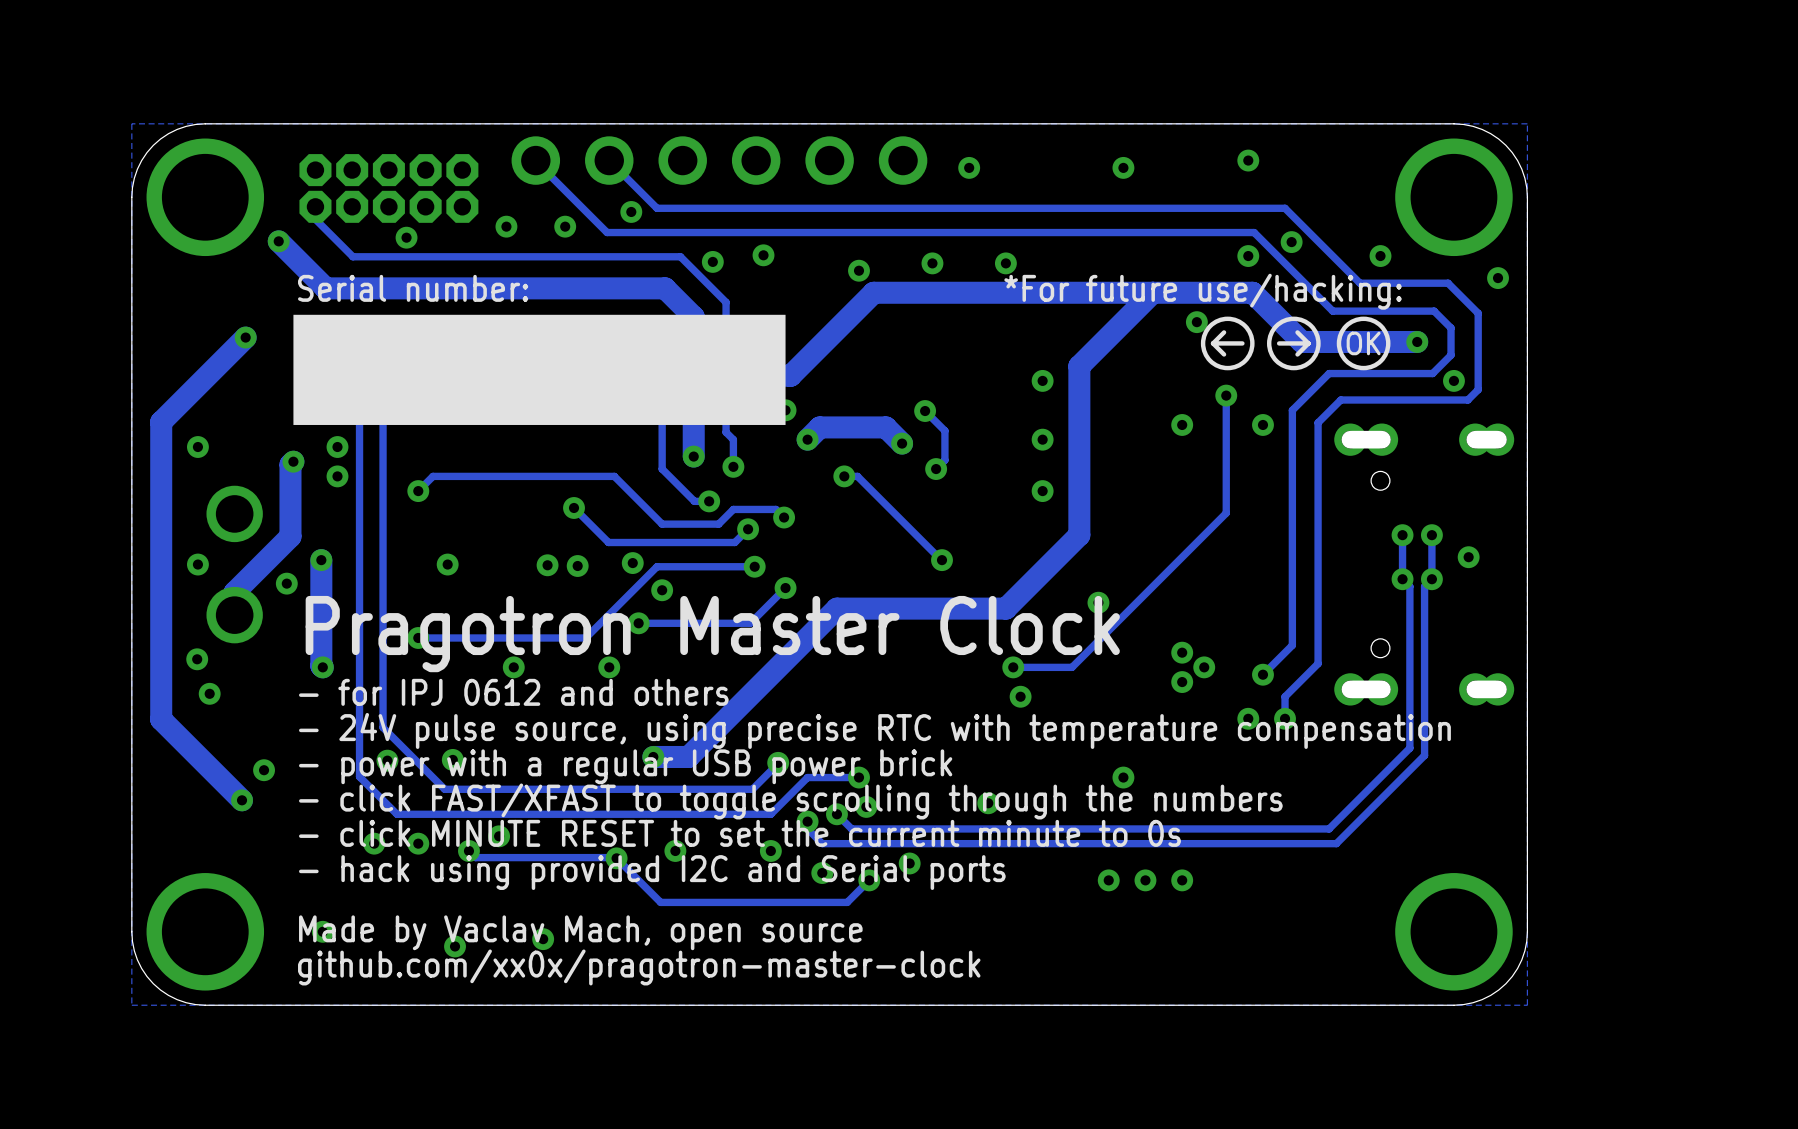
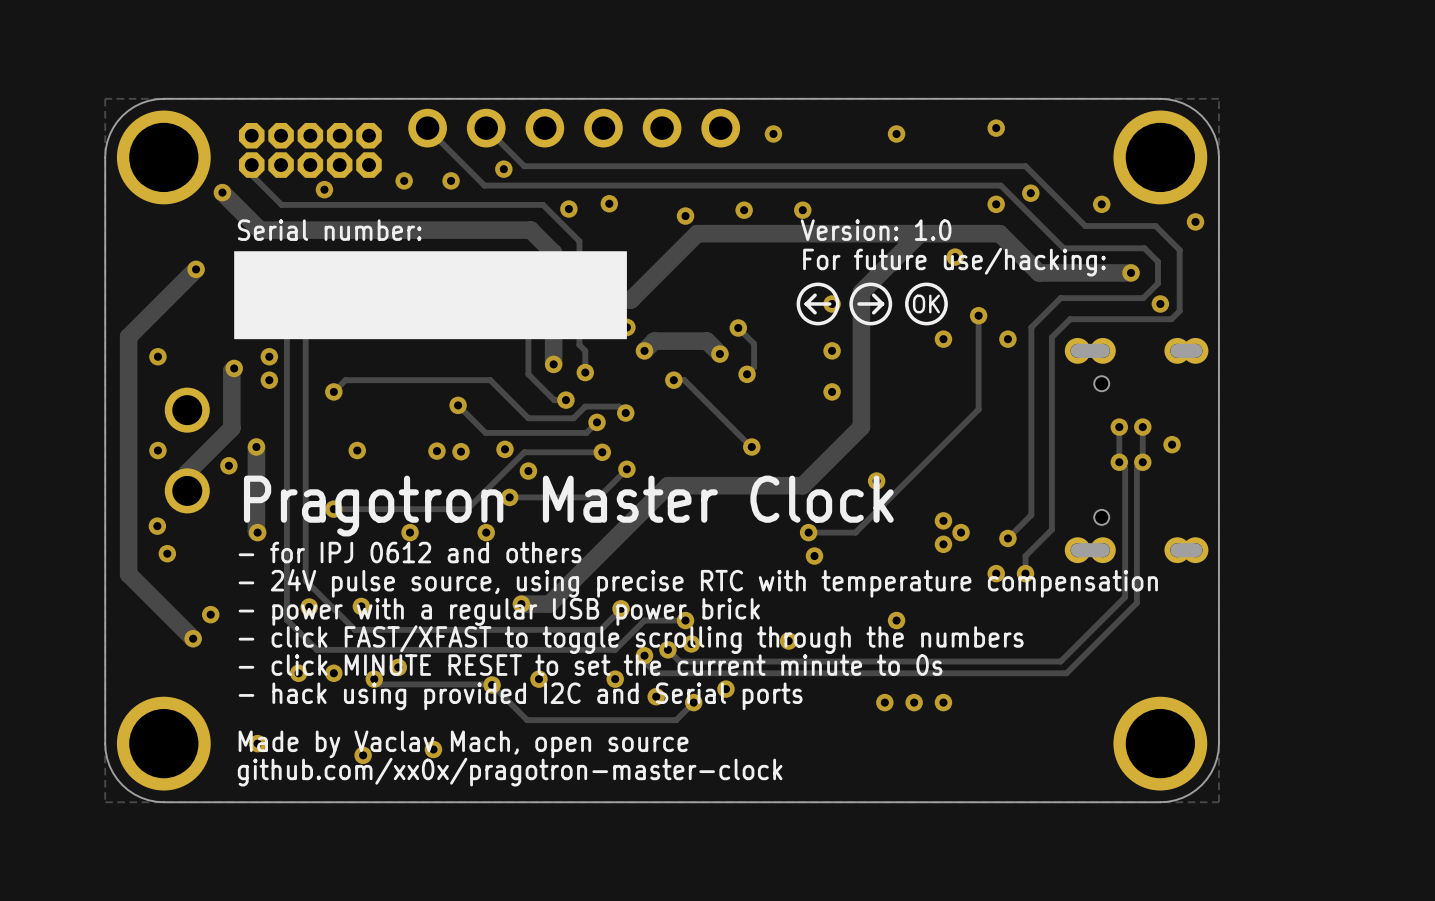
text: *For future use/hacking: (1203, 291) -> Version: 1.0 (876, 230)
drawing: [1200, 316, 1391, 371] -> none
text: none -> For future use/hacking: (954, 262)
line: (1224, 332) (1213, 343) -> (815, 295) (806, 303)
line: (1297, 332) (1308, 343) -> (873, 295) (882, 303)
line: (1213, 343) (1224, 354) -> (806, 303) (815, 312)
line: (1242, 343) (1213, 343) -> (829, 303) (806, 303)
line: (1308, 343) (1279, 343) -> (882, 303) (859, 303)
line: (1308, 343) (1297, 354) -> (882, 303) (873, 312)
text position: OK (1363, 343) -> OK (926, 303)
drawing: none -> [796, 282, 948, 326]

